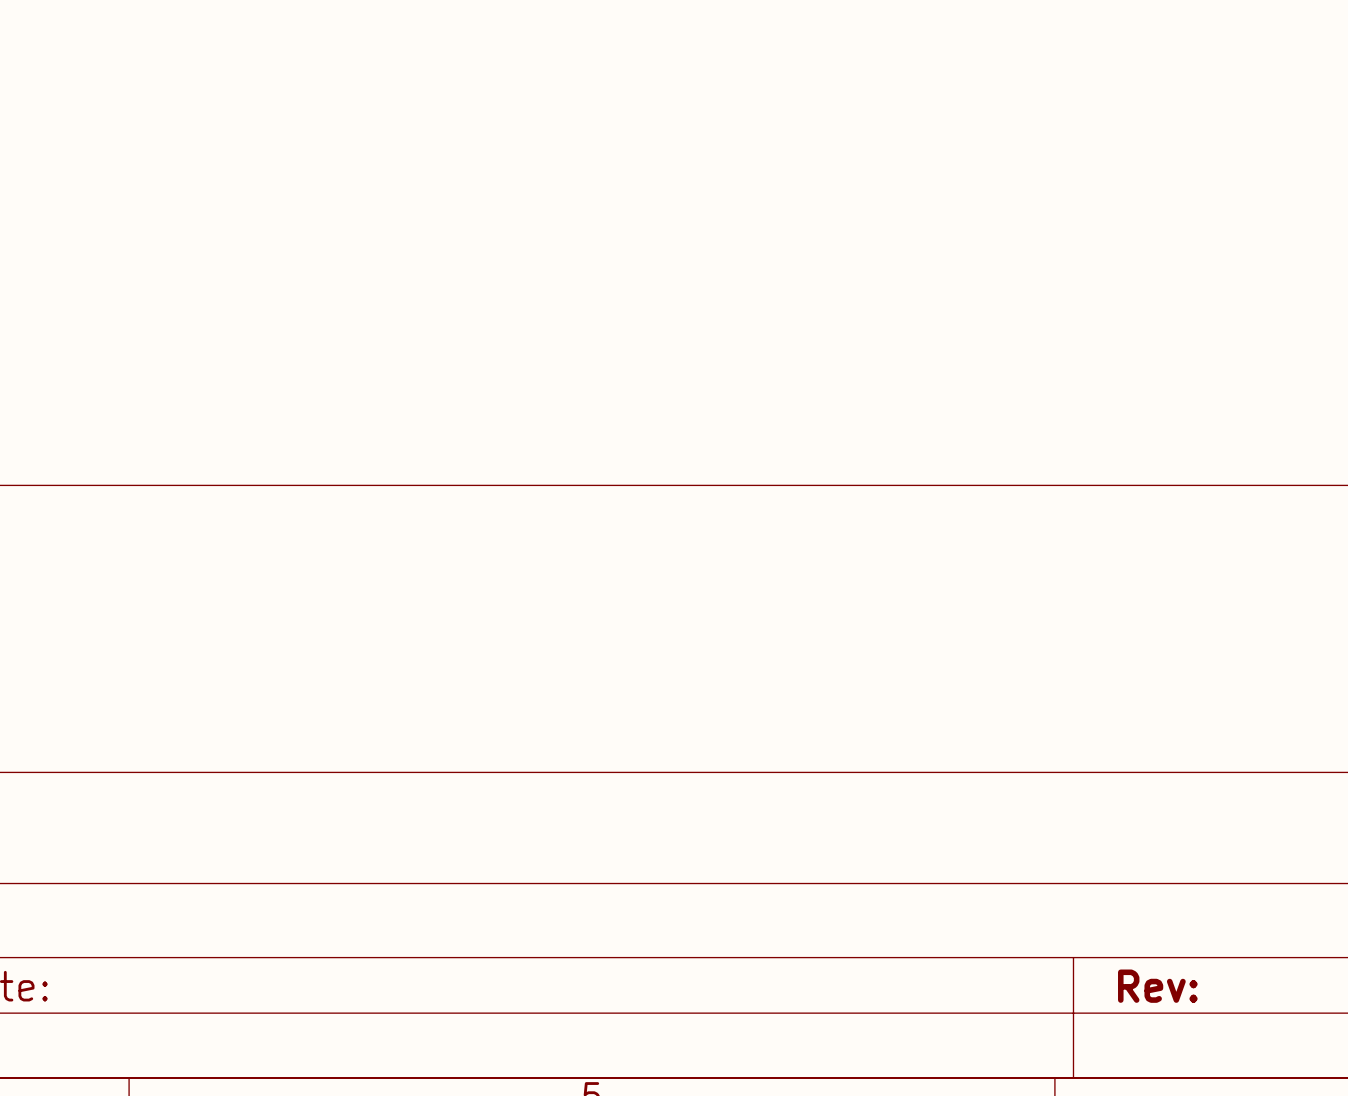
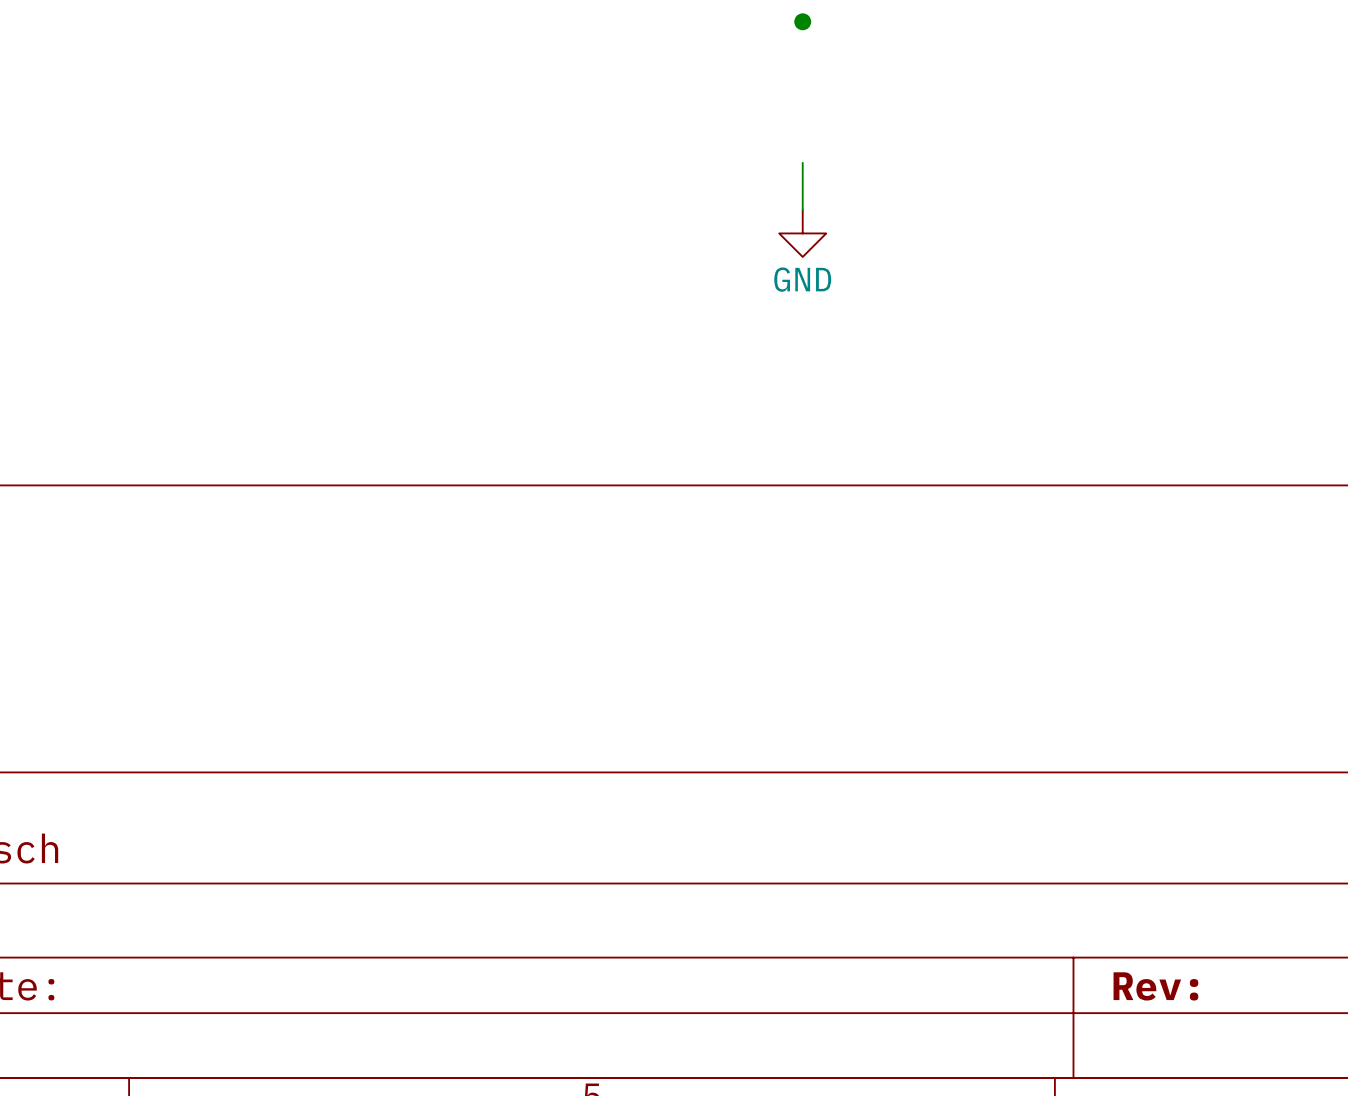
junction: none -> (802, 21)
wire: none -> (802, 162) (802, 209)
power symbol: none -> GND (802, 233)

